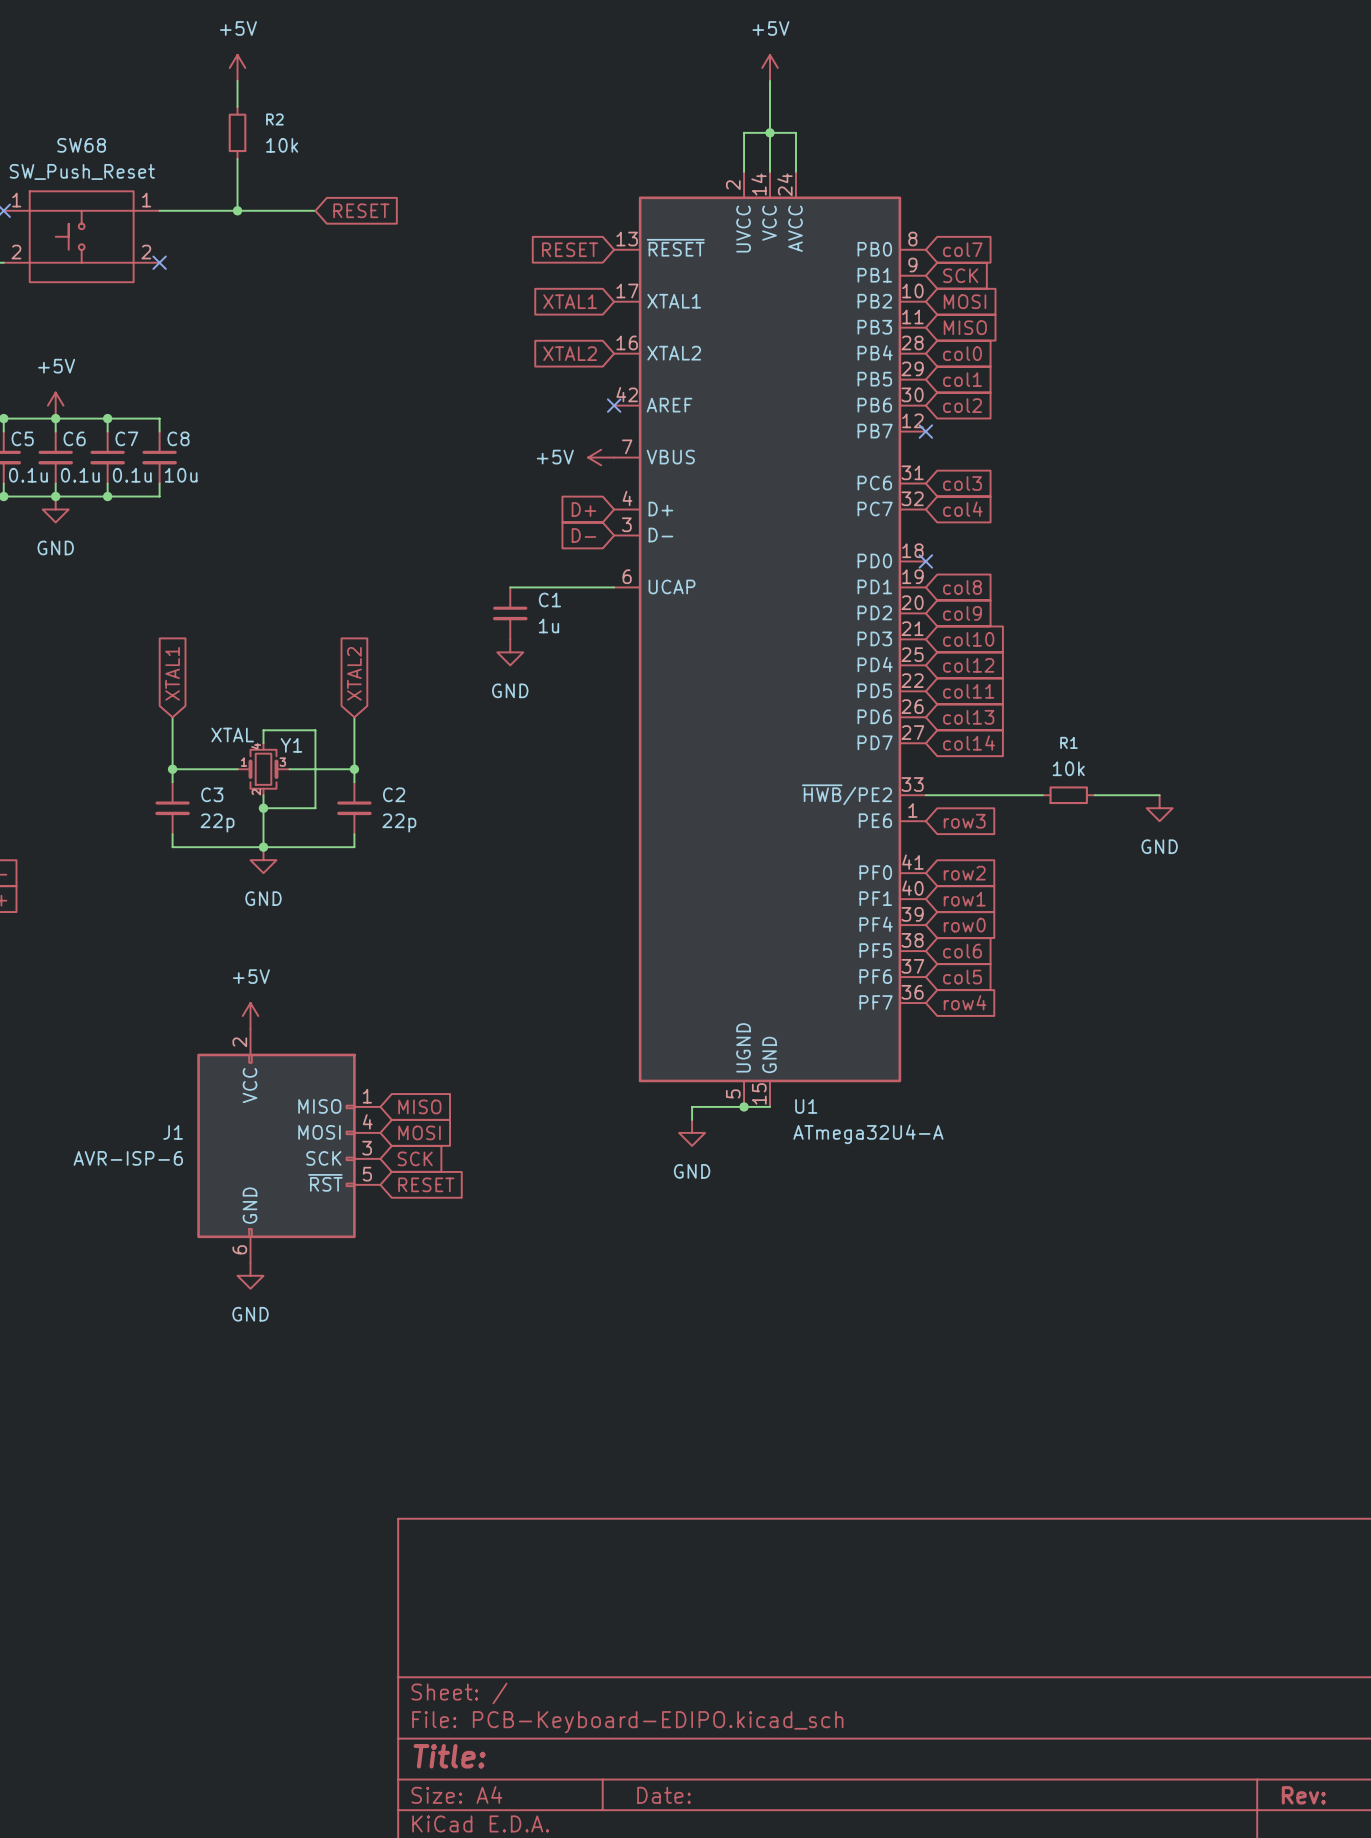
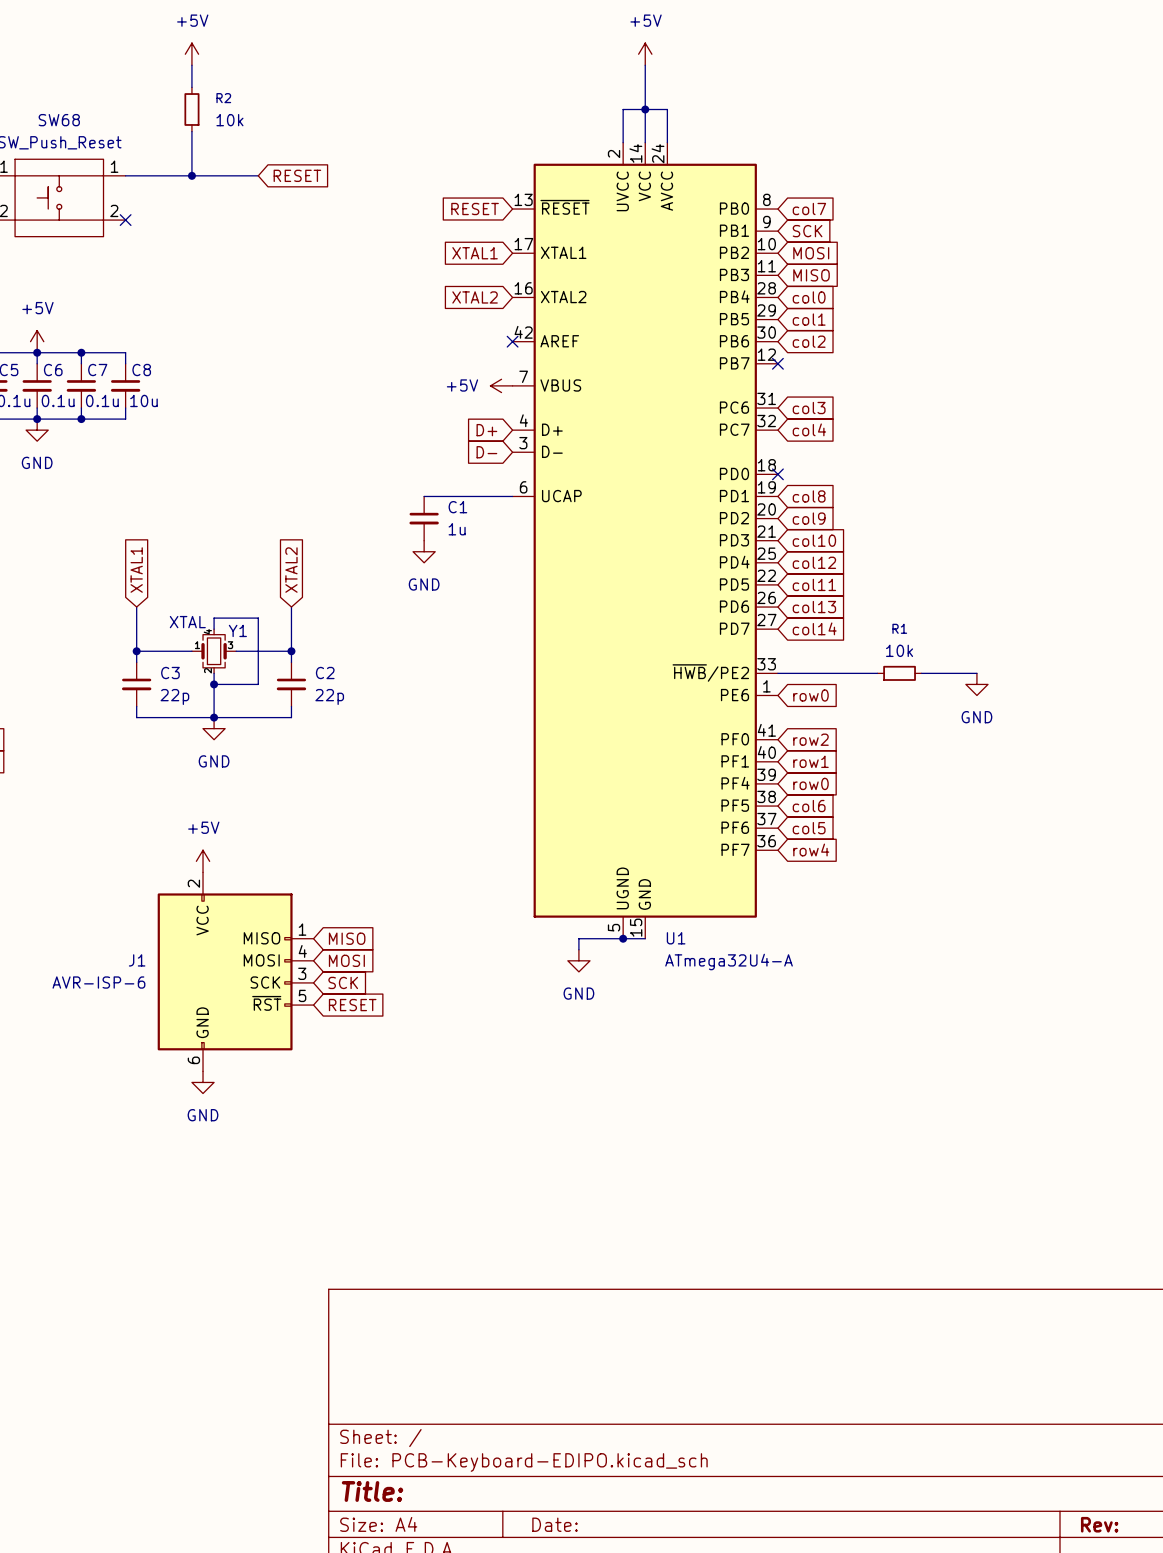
global label: row3 (964, 821) -> row0 (810, 695)

